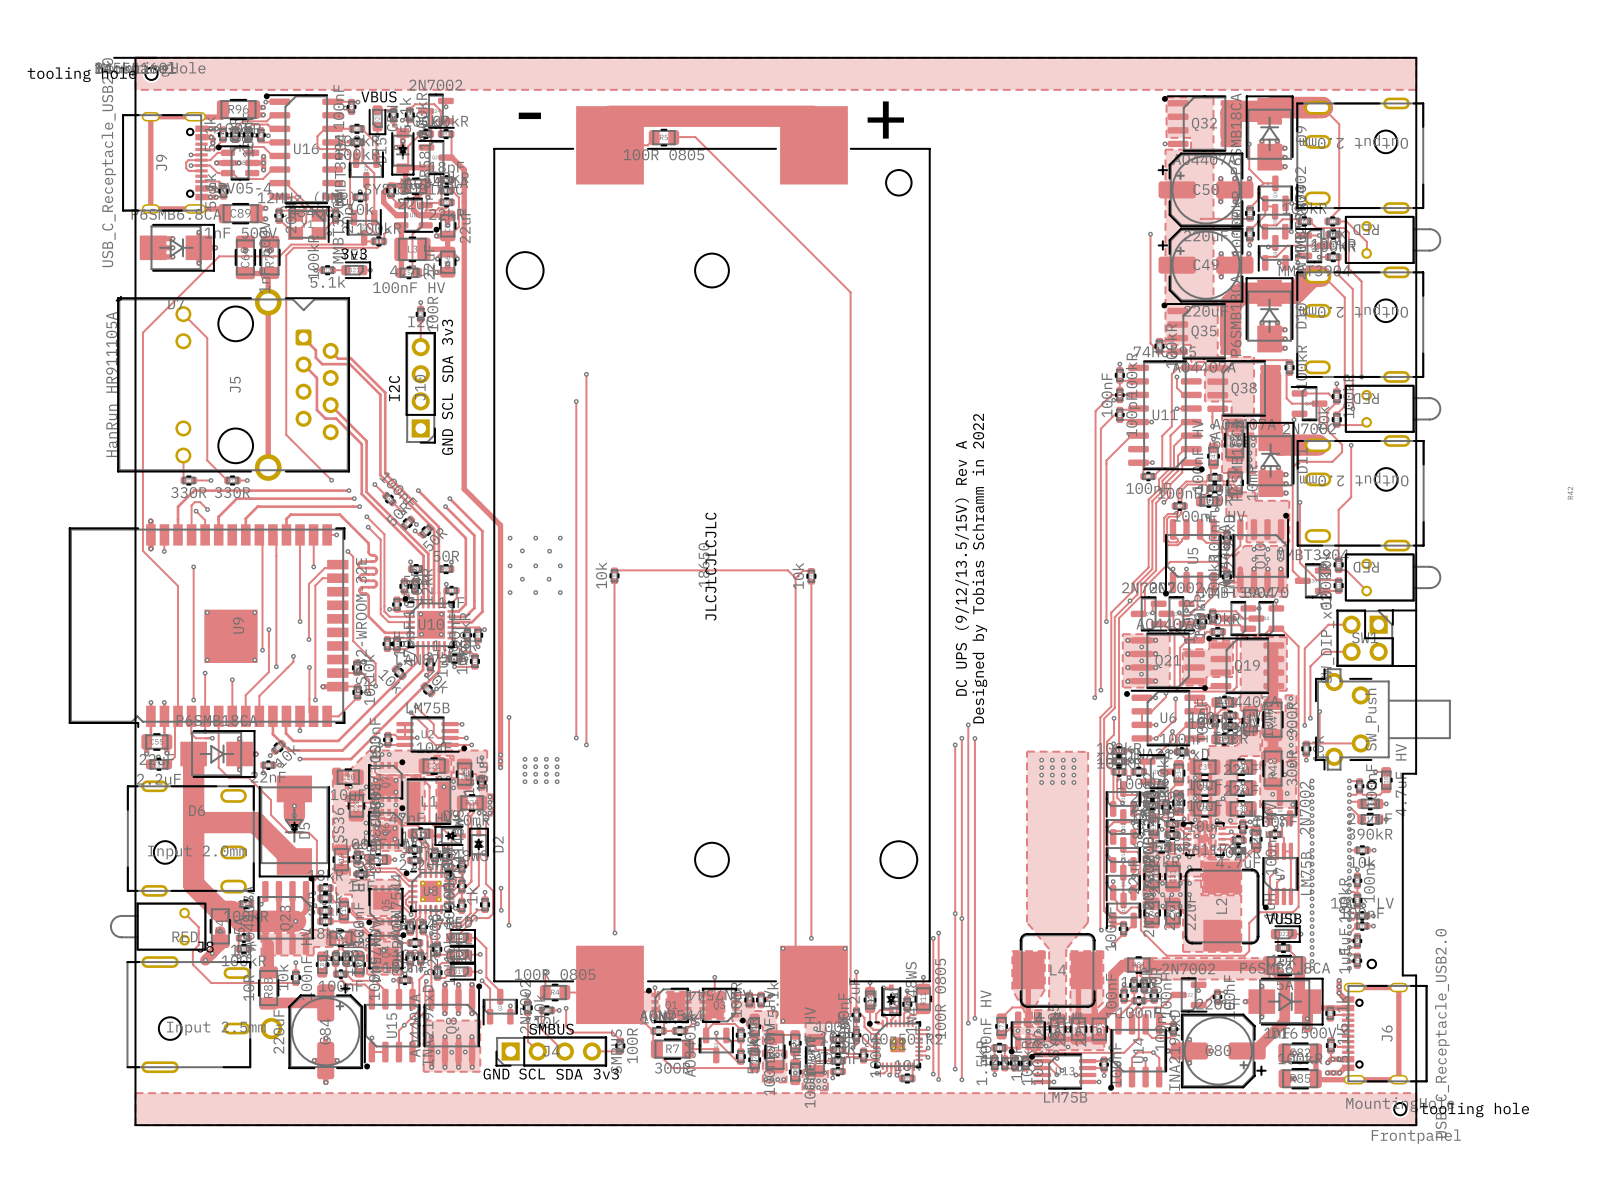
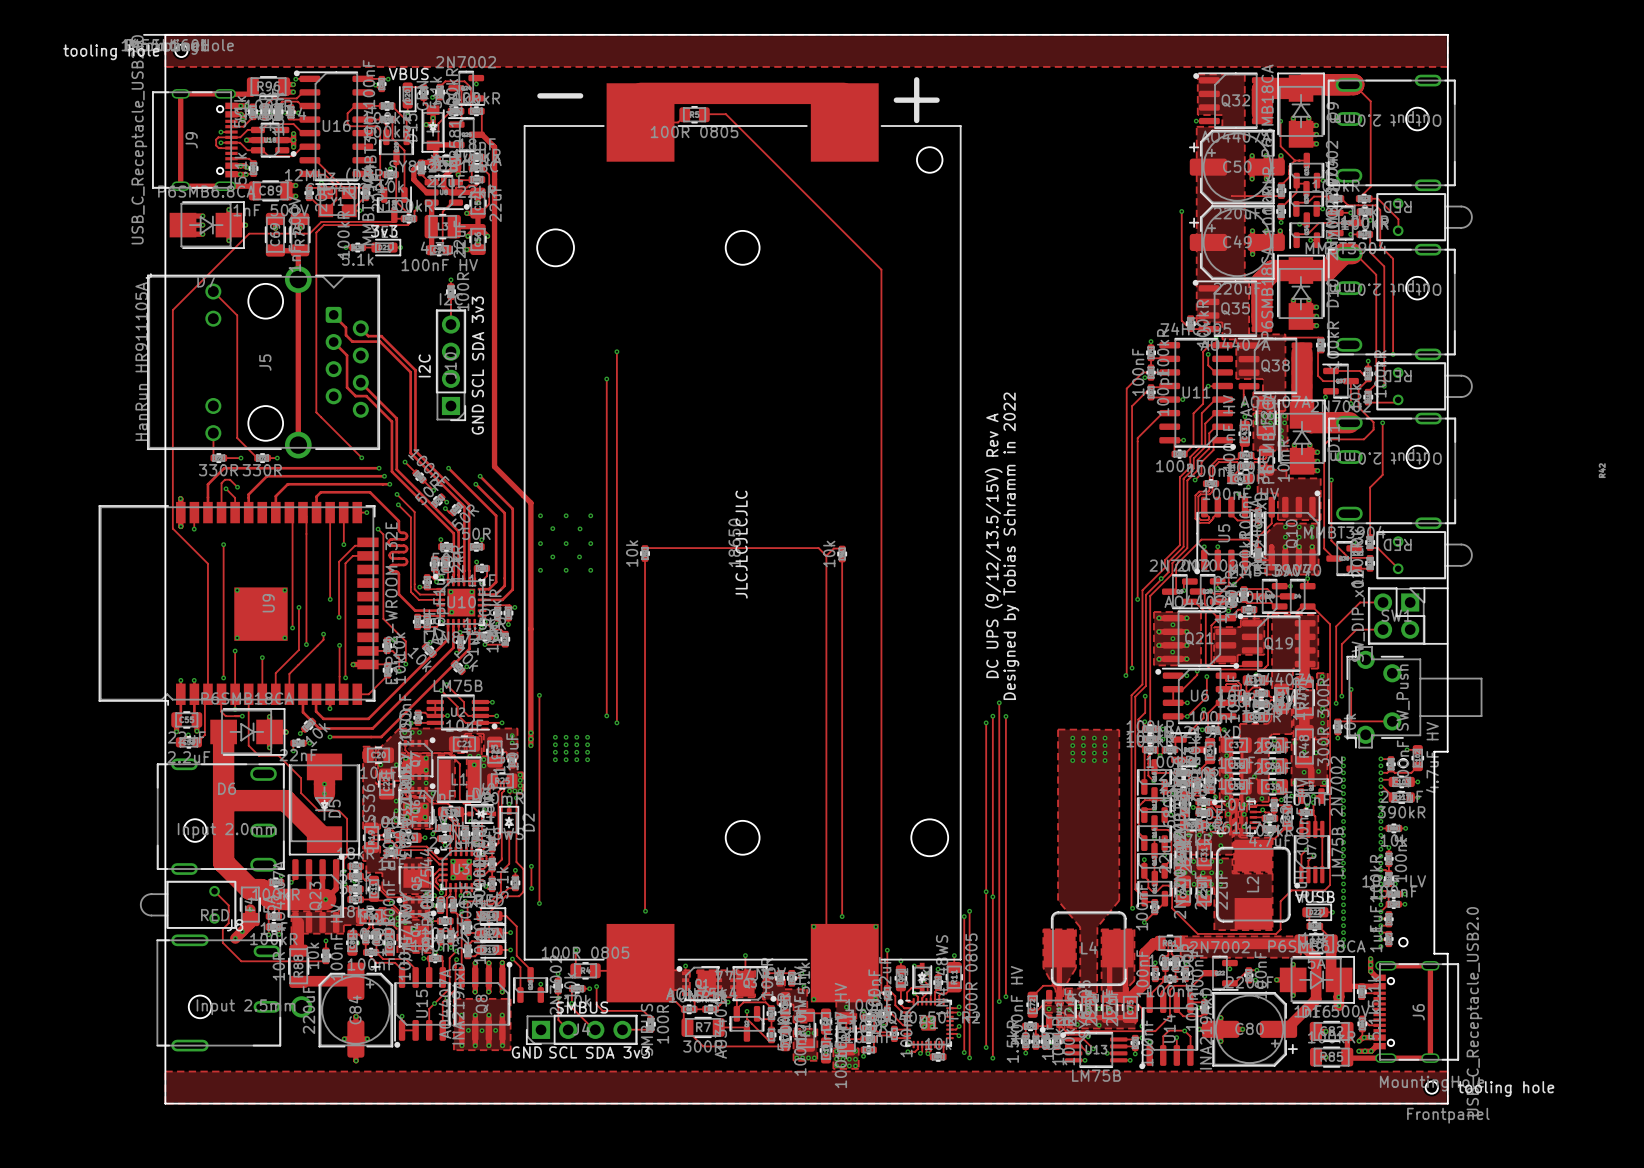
drawing: [215, 144, 222, 151] -> none
part rotation: 0° (239, 162) -> 180° (270, 140)
drawing: none -> [290, 150, 297, 157]

